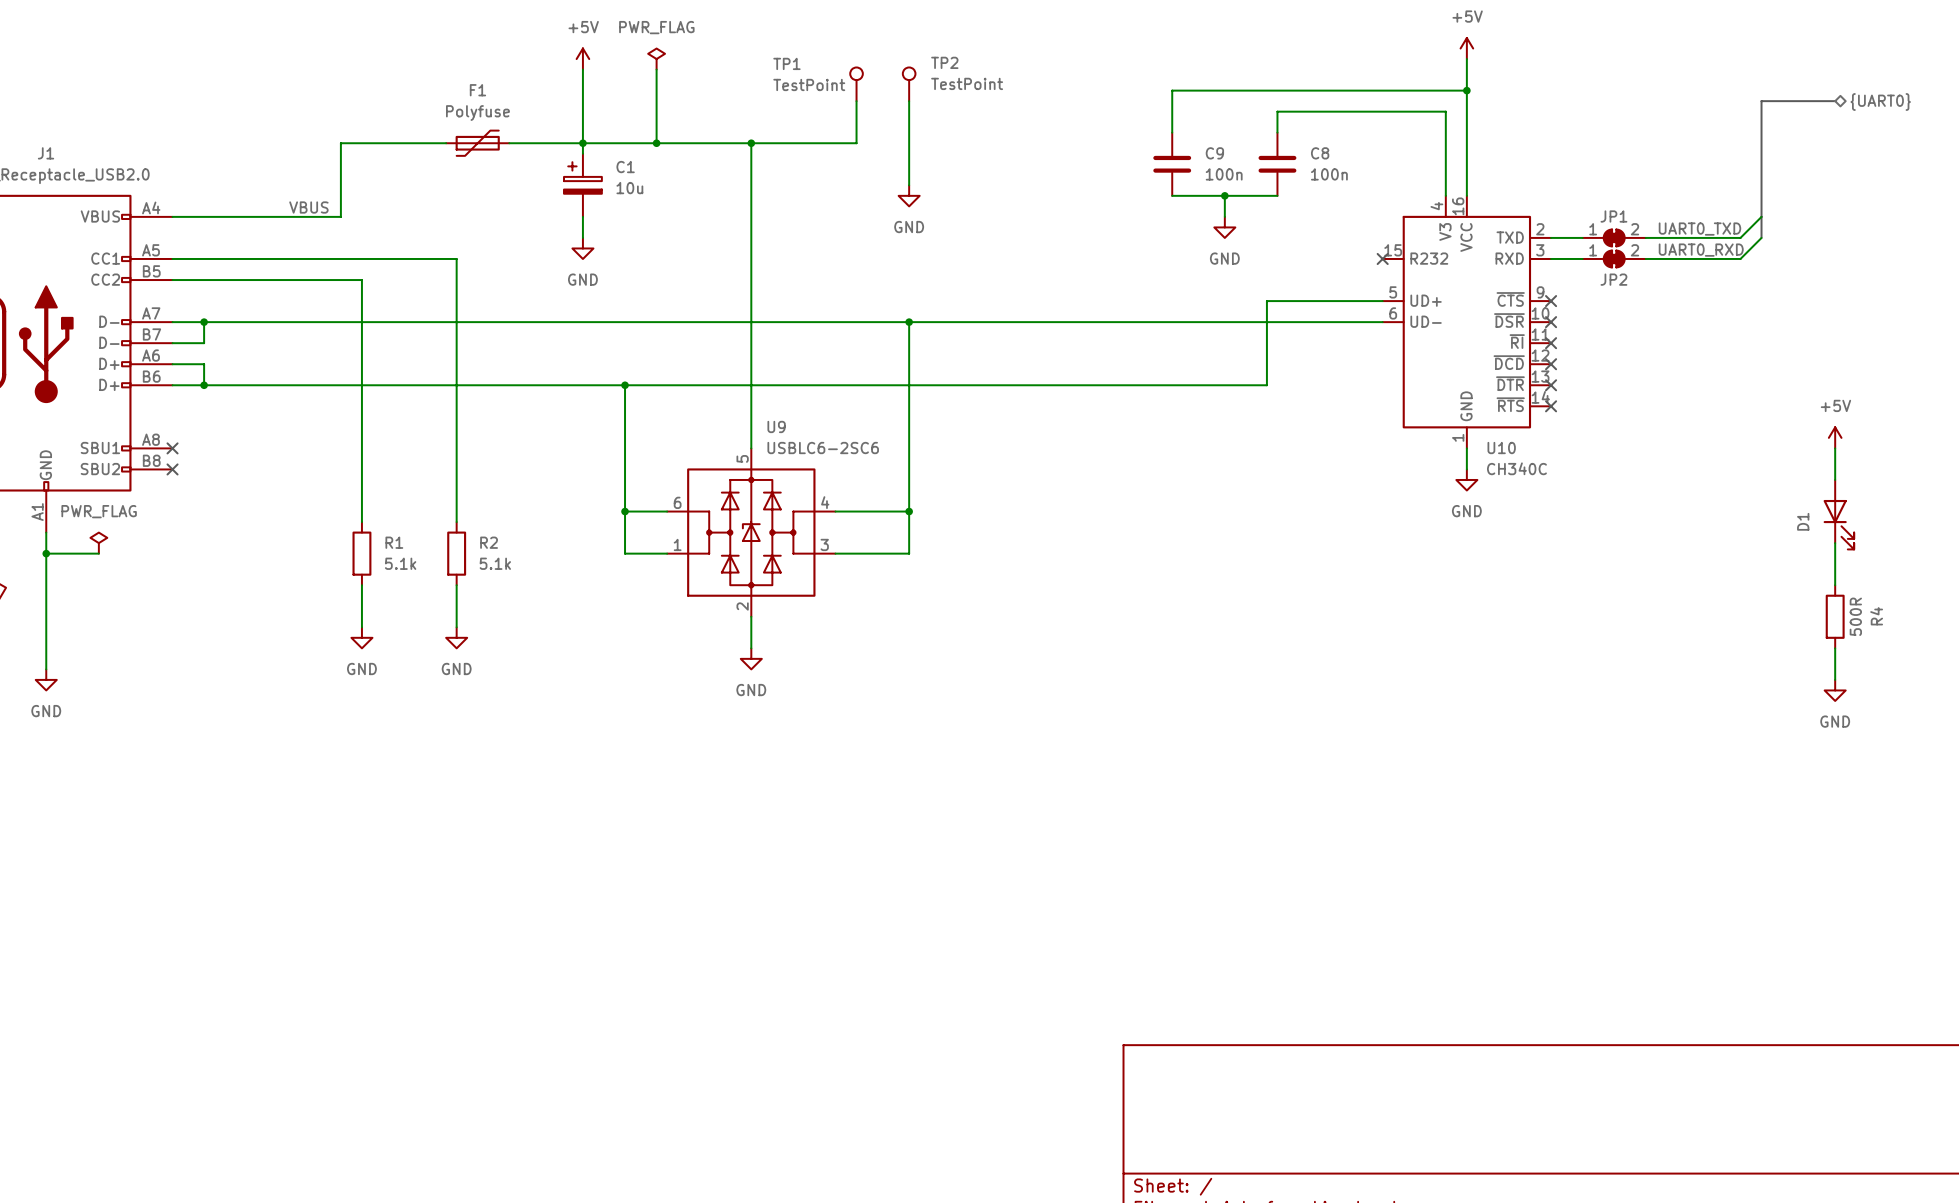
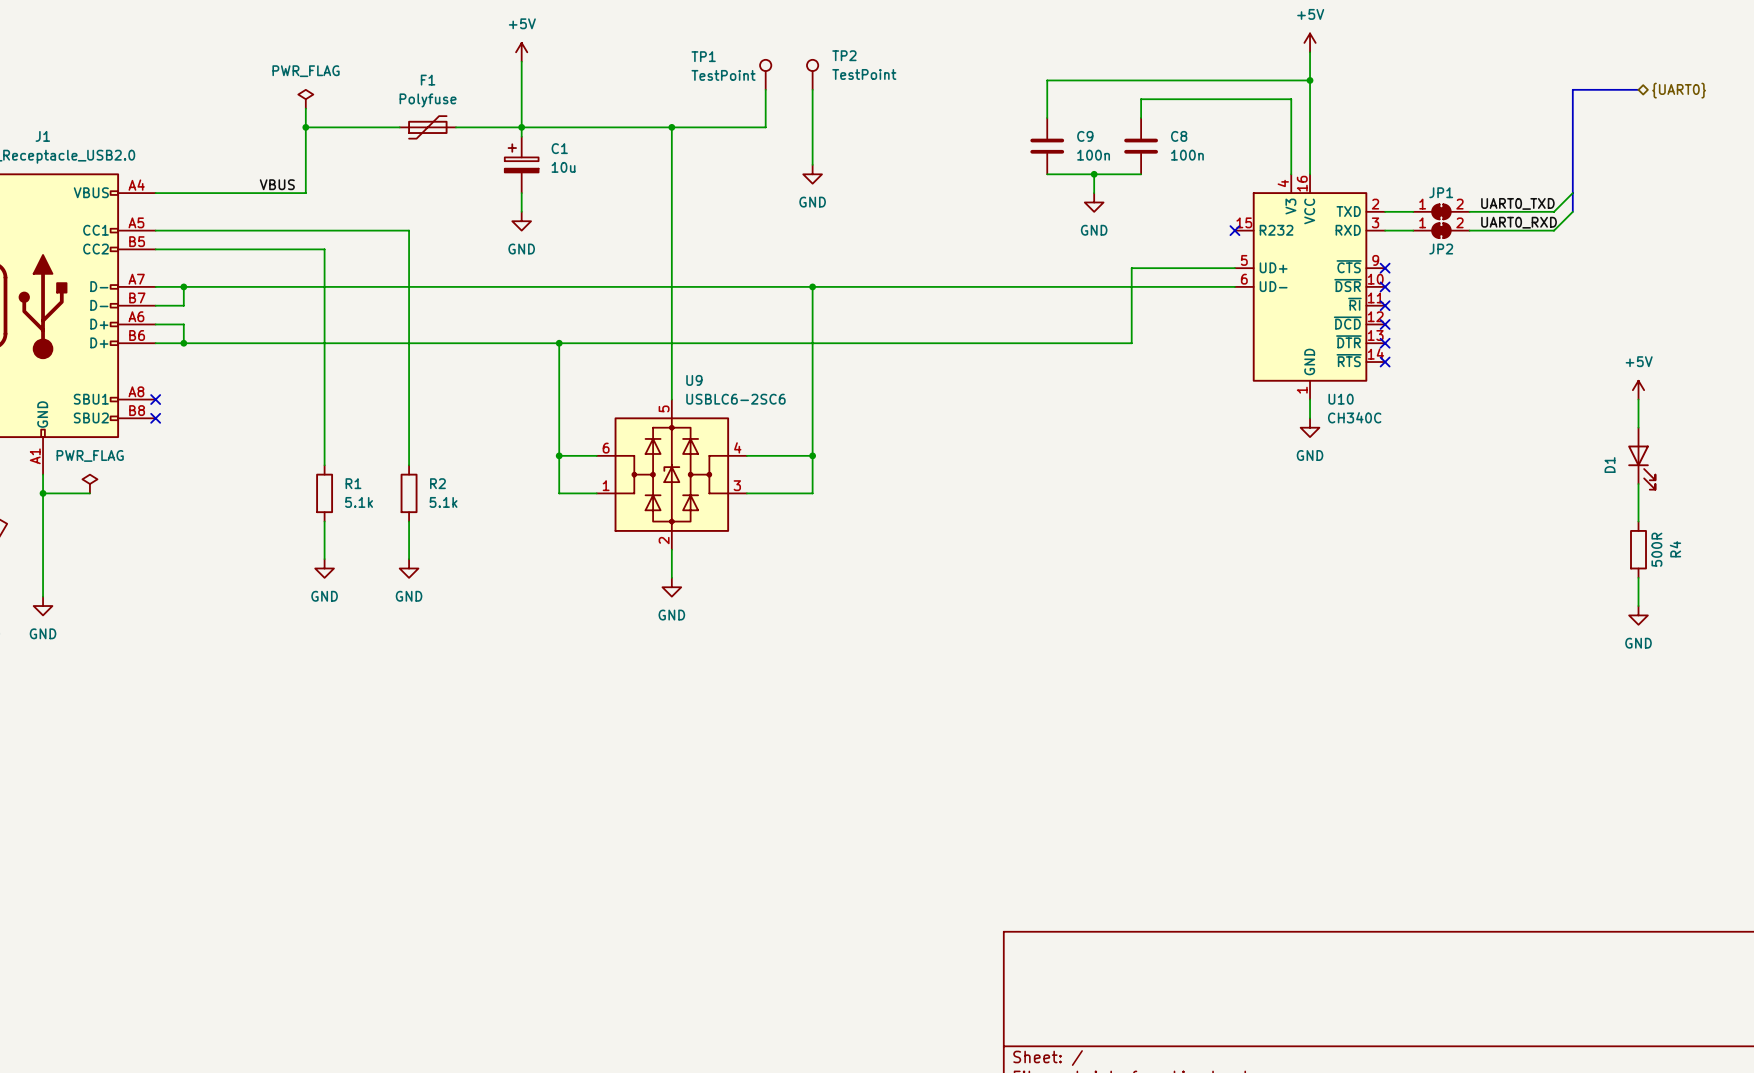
power symbol: PWR_FLAG (656, 59) -> none
wire: (656, 69) (656, 143) -> none
power symbol: none -> PWR_FLAG (305, 99)
wire: none -> (305, 108) (305, 127)
junction: none -> (305, 127)
junction: (656, 143) -> none

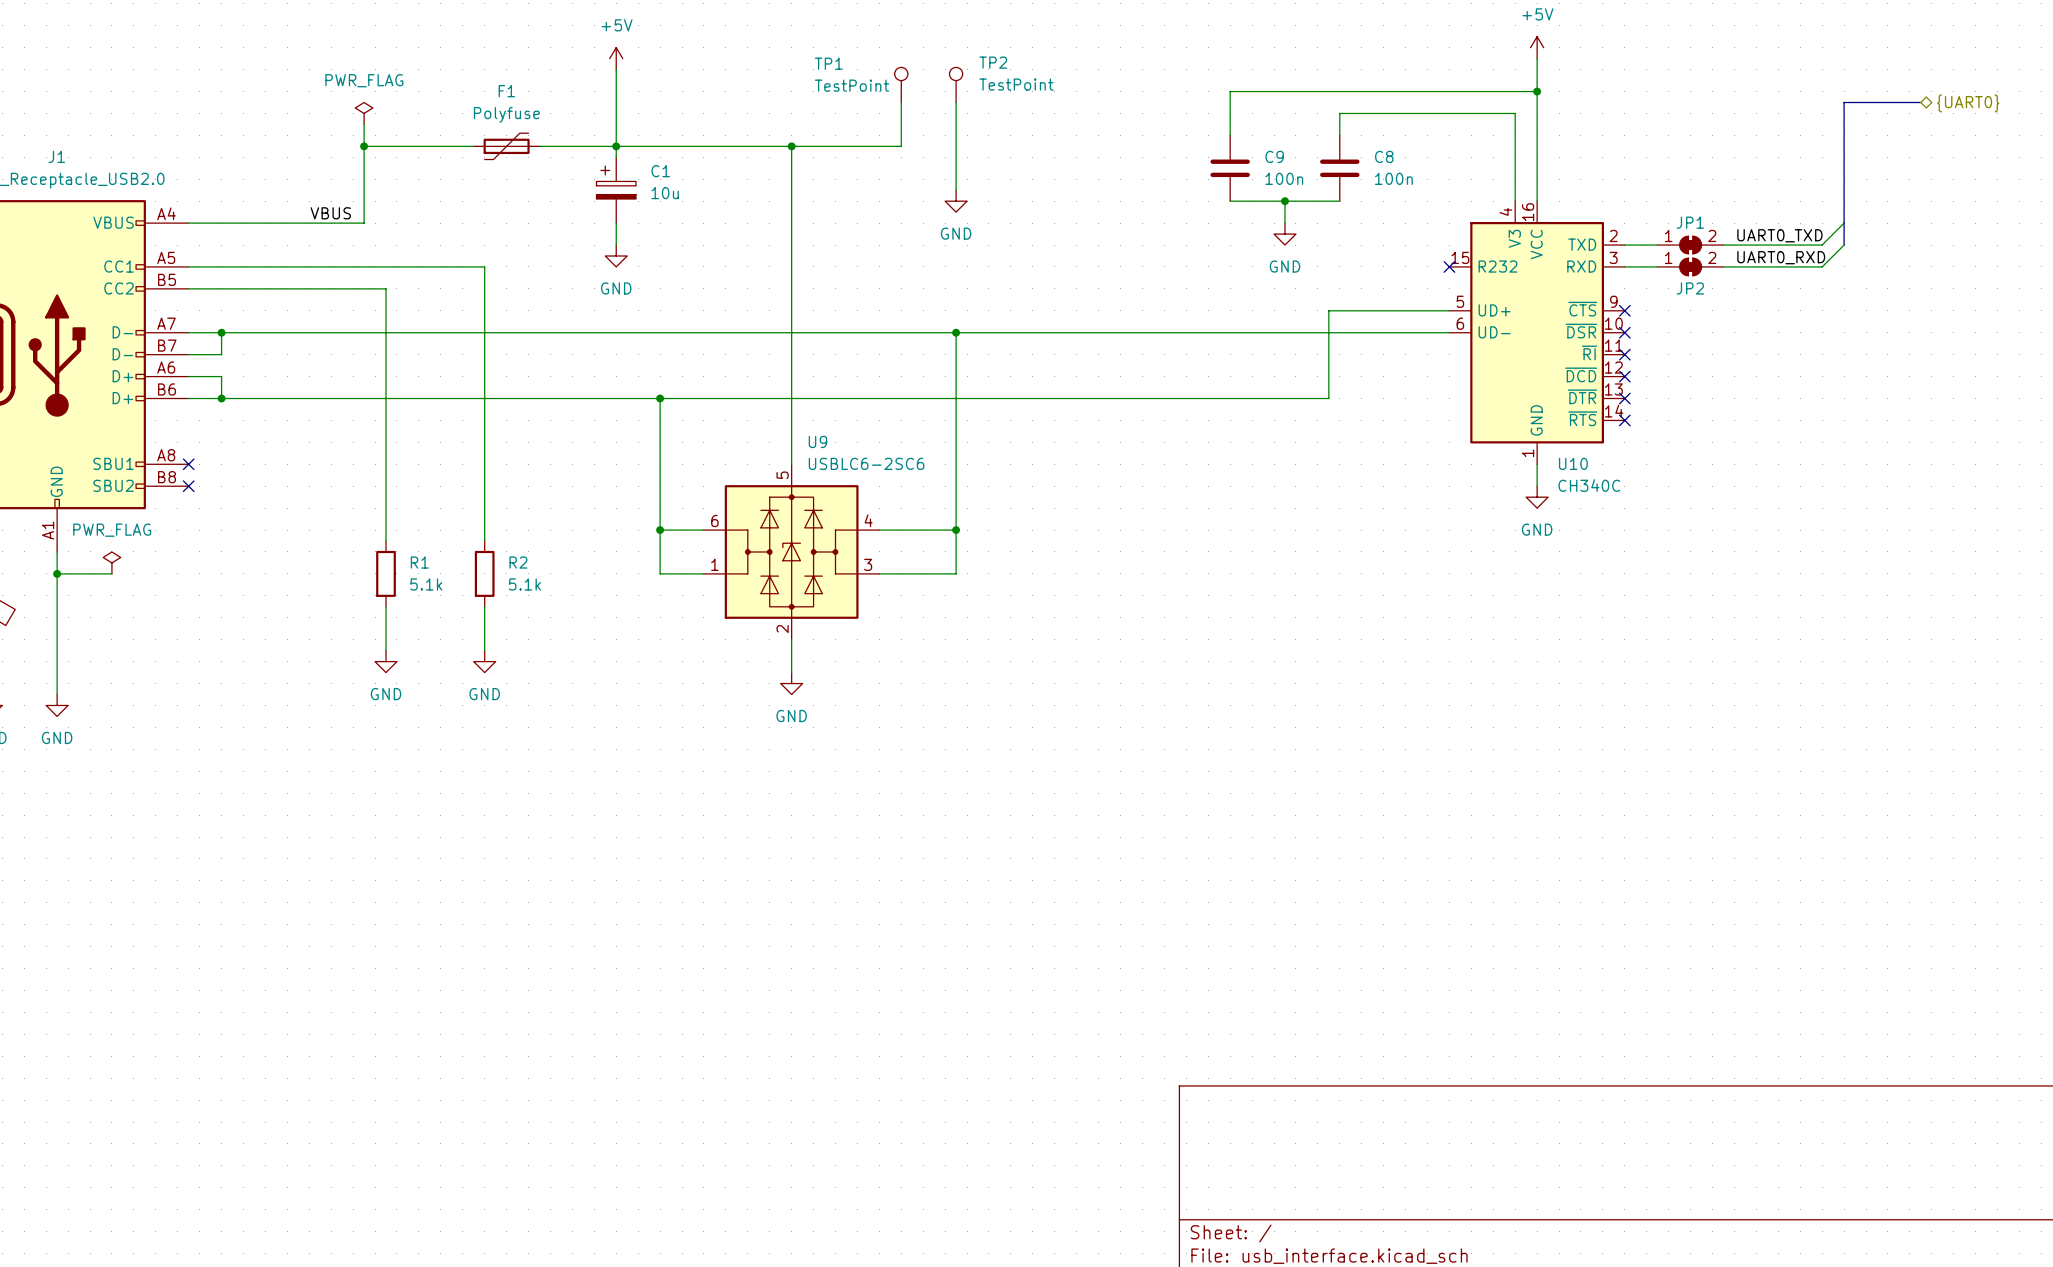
power symbol: +5V (1638, 390) -> none
wire: (1638, 399) (1638, 427) -> none
D1: (1641, 458) -> none
wire: (1638, 484) (1638, 521) -> none
R4: 500R (1638, 549) -> none
wire: (1638, 577) (1638, 606) -> none
power symbol: GND (1638, 615) -> none

